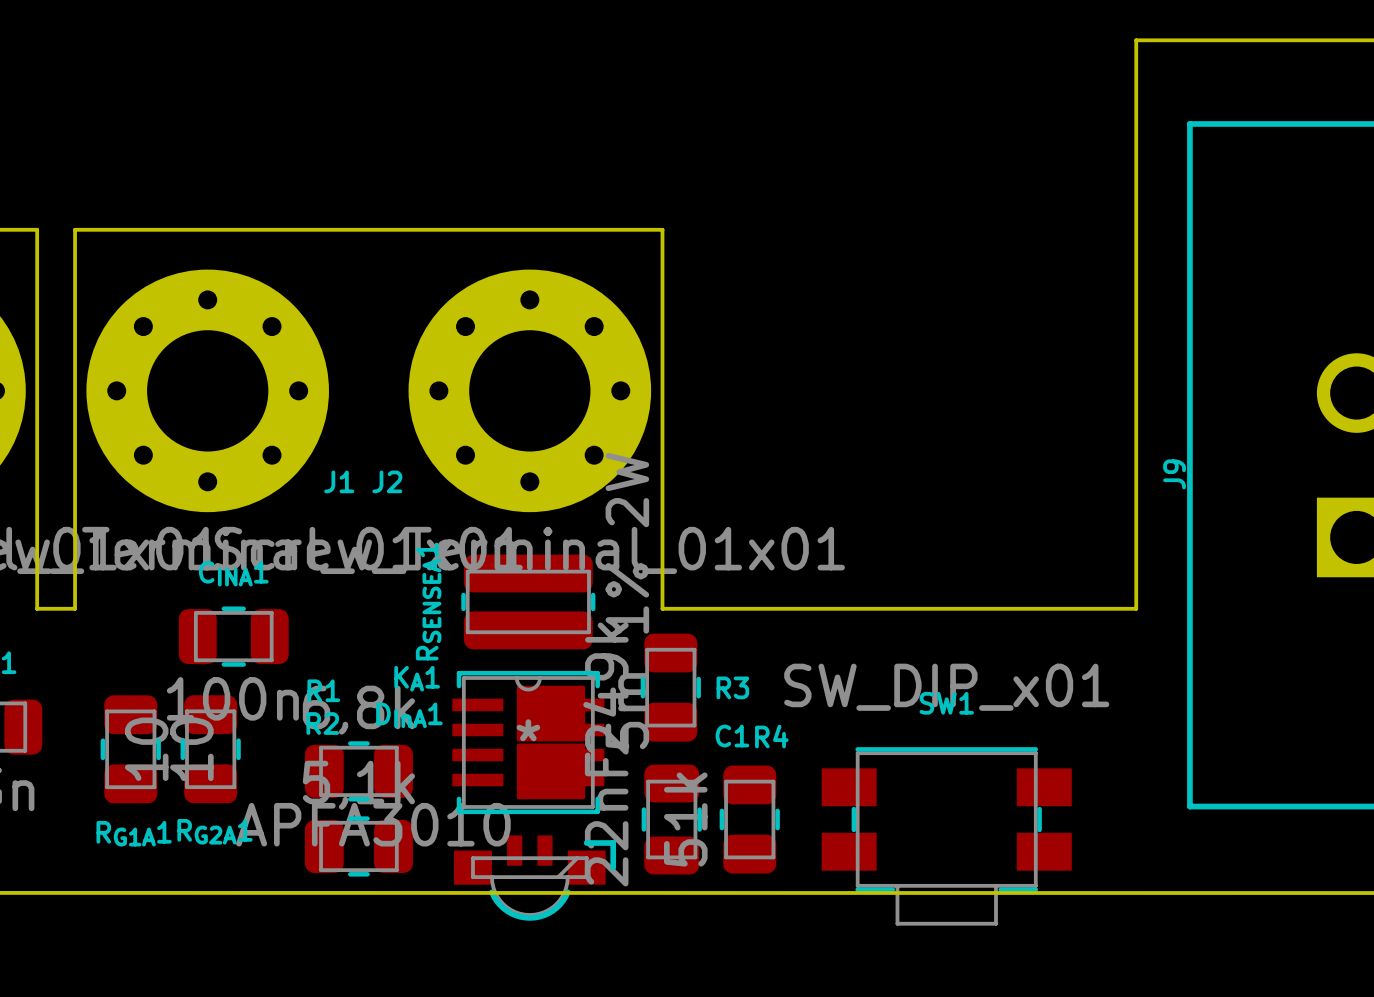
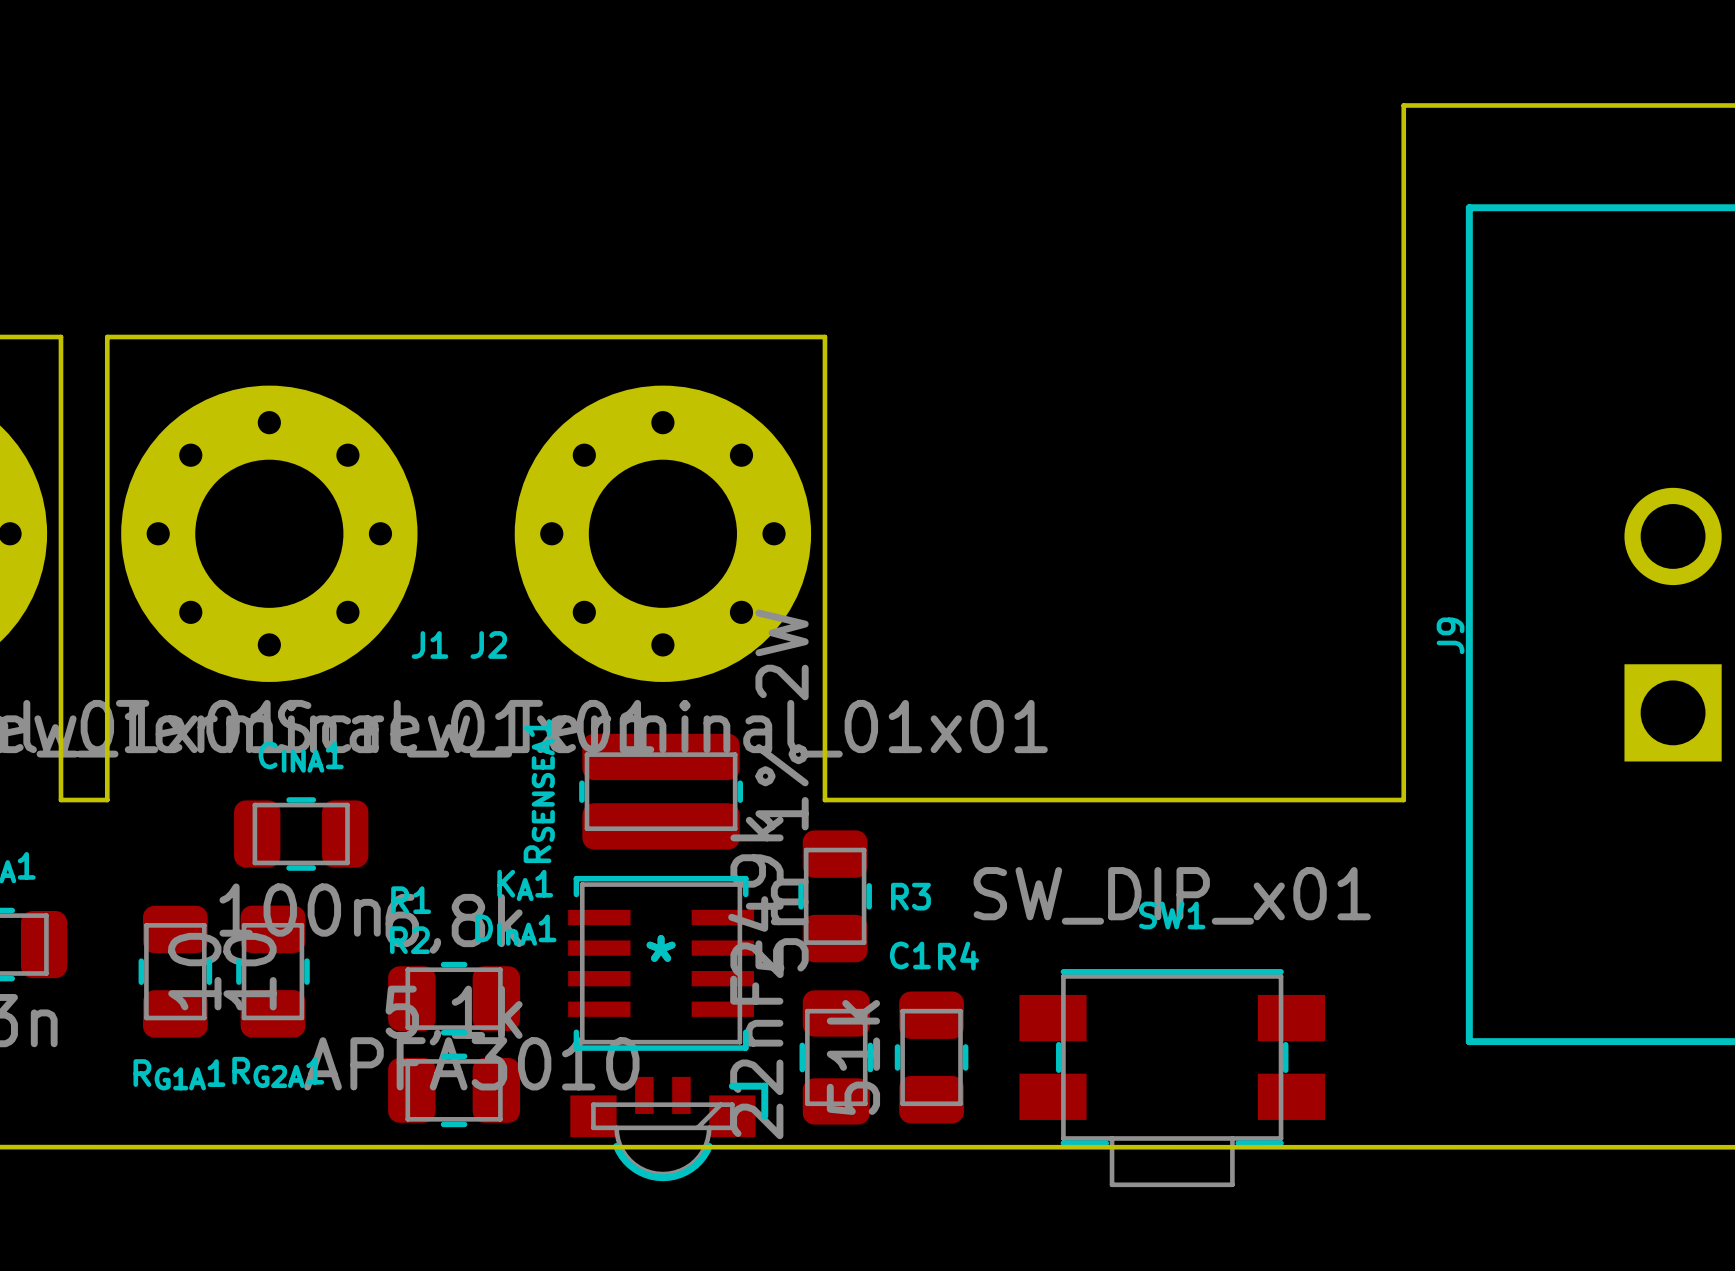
KA1 footprint: [452, 670, 605, 815] -> [568, 875, 754, 1051]

